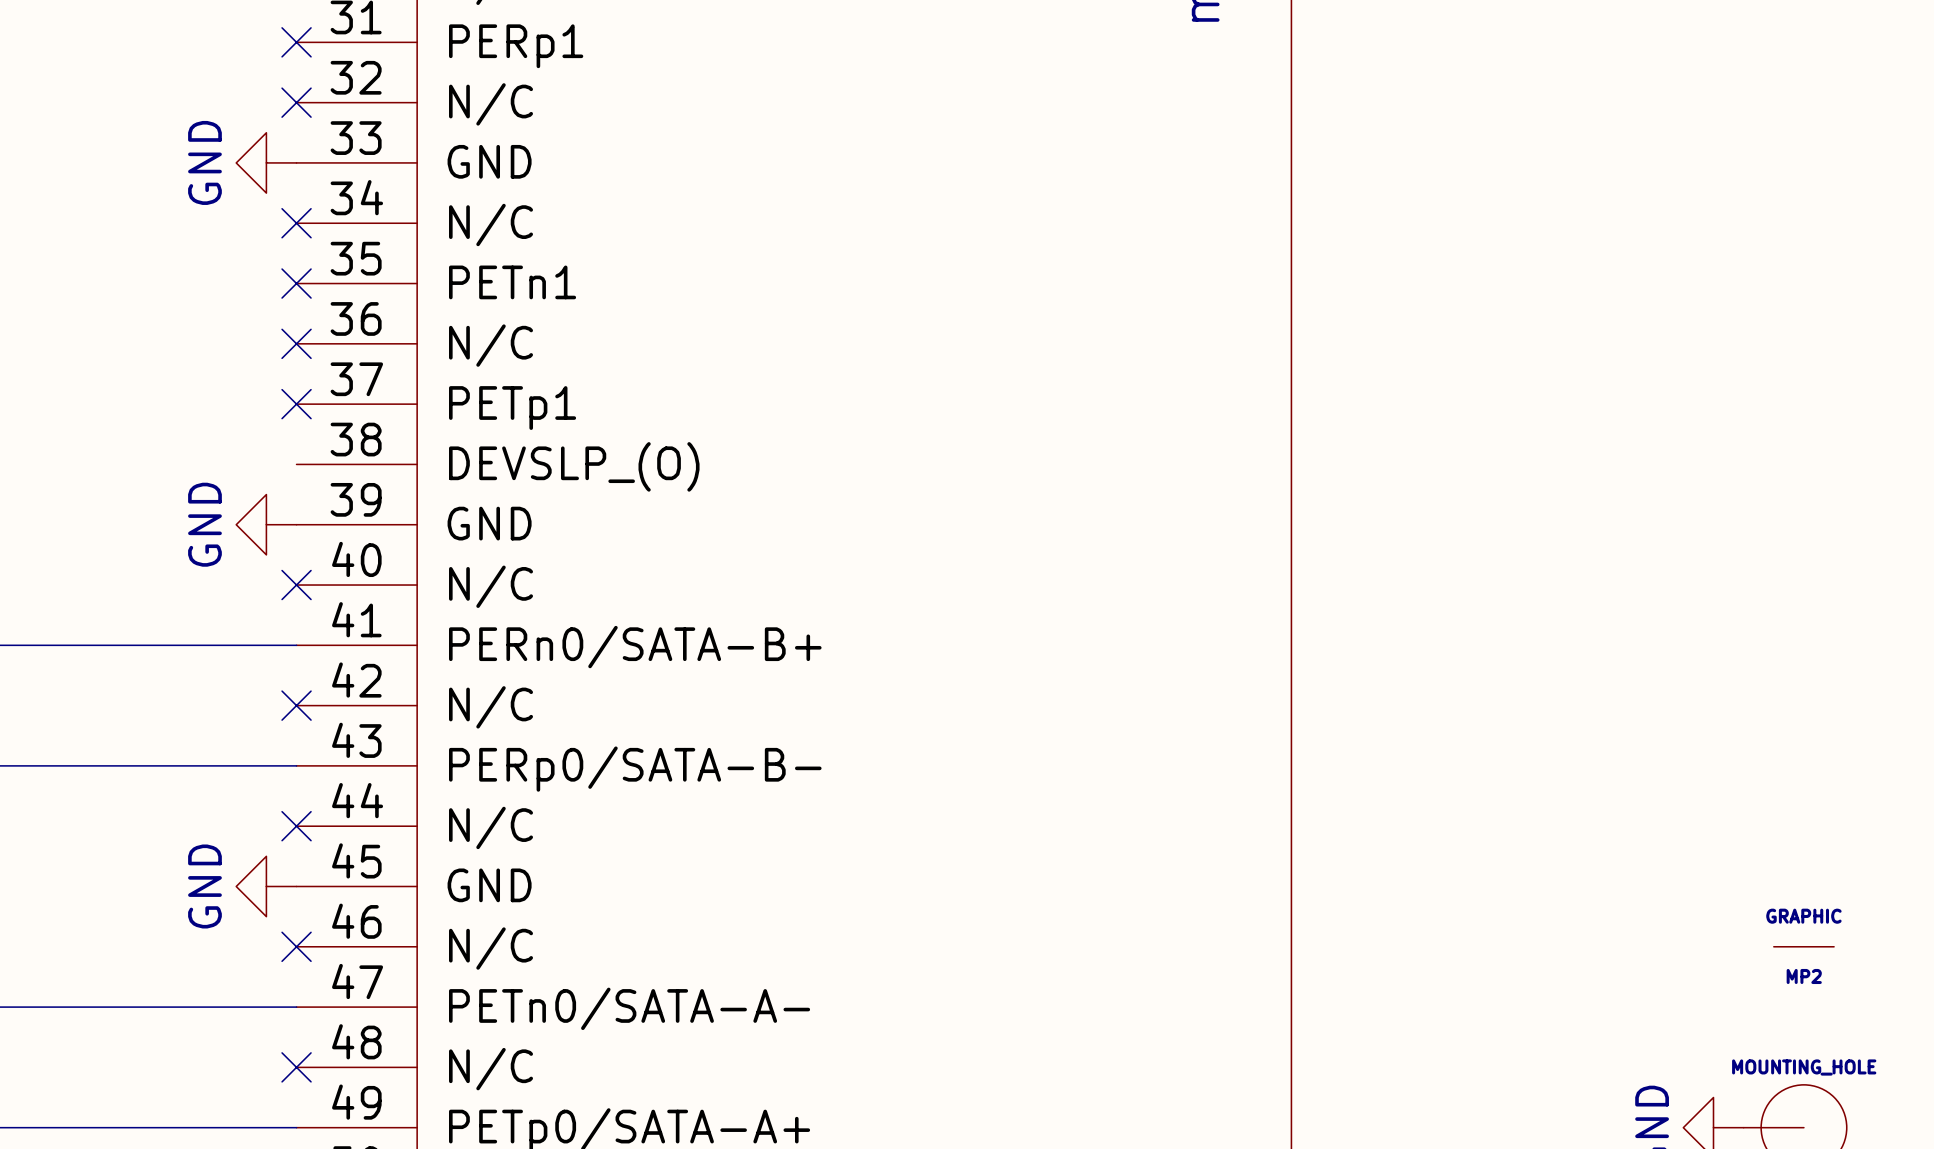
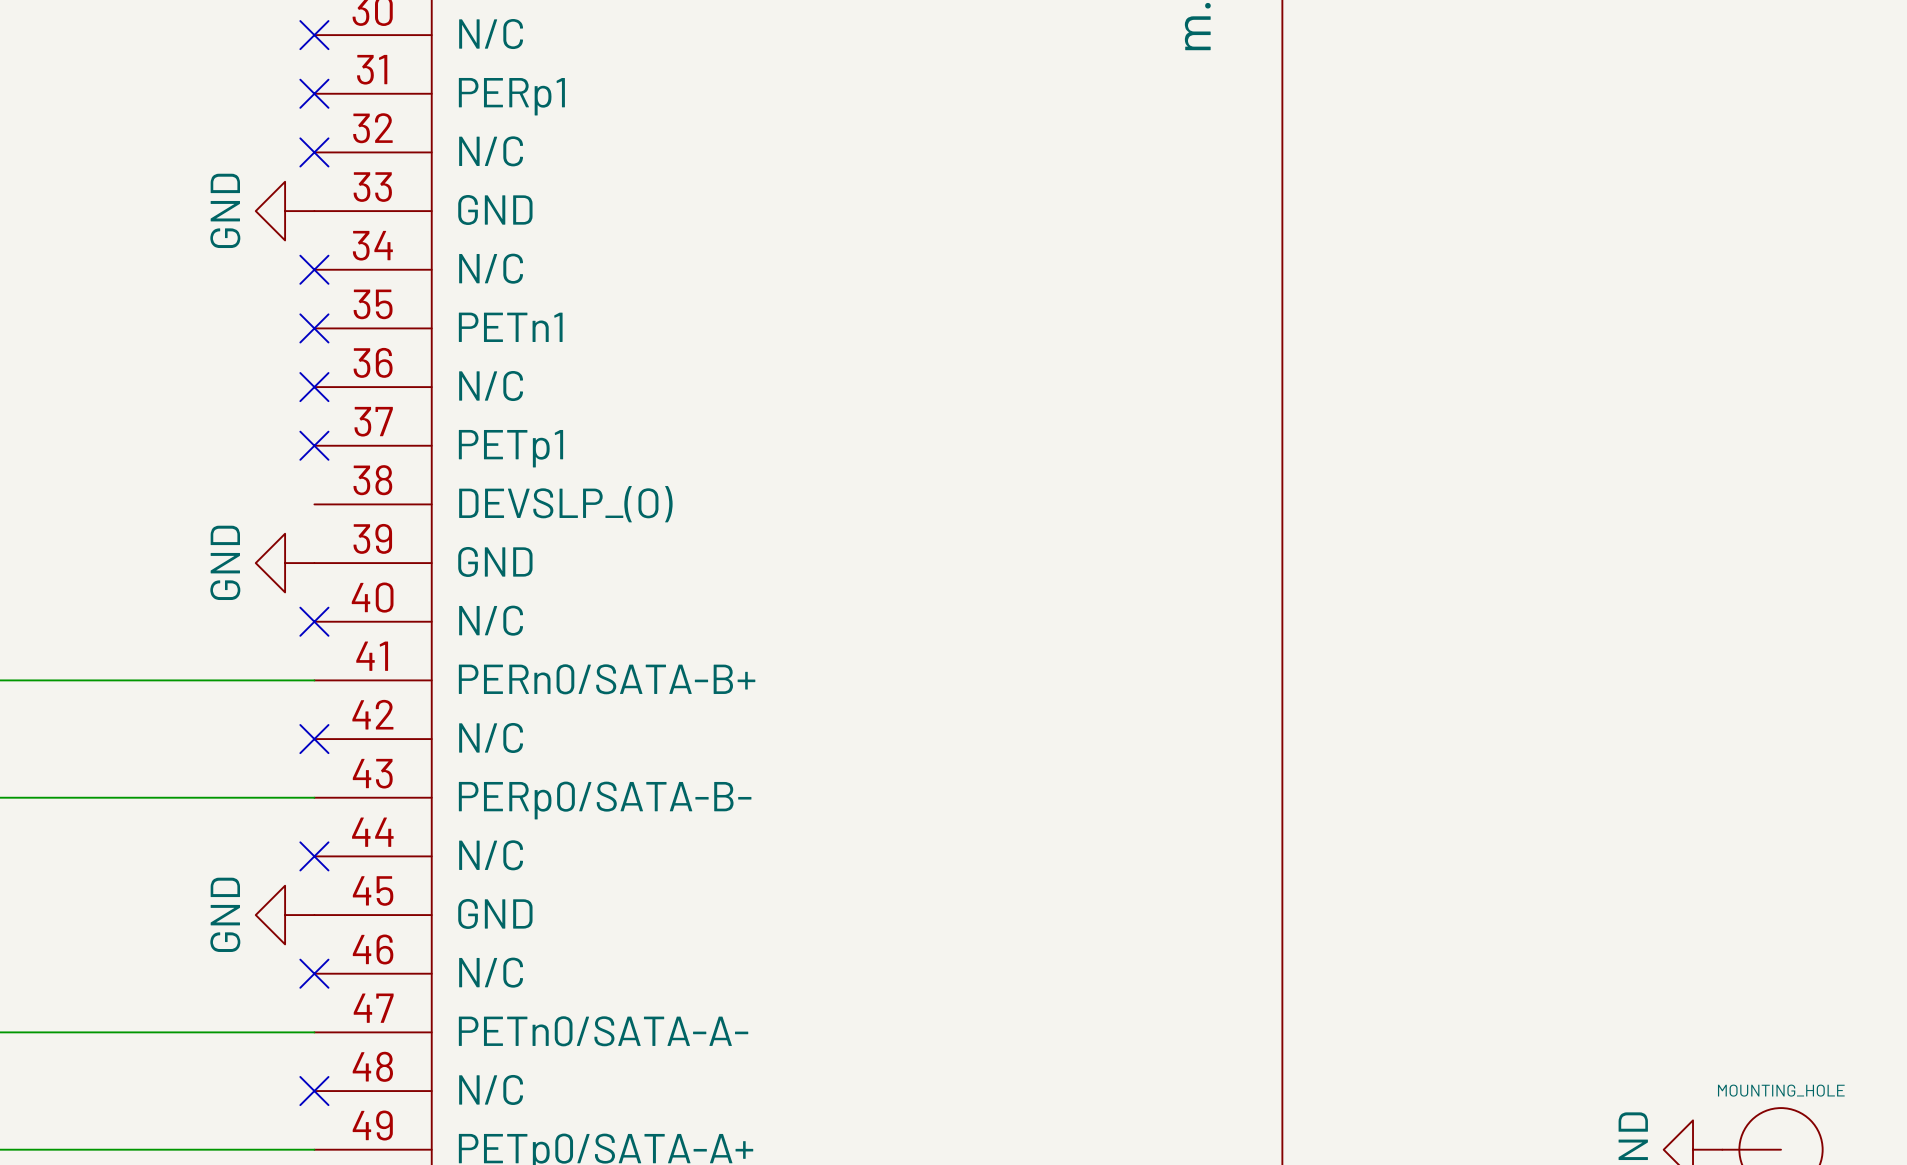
MP2: GRAPHIC (1803, 946) -> none

